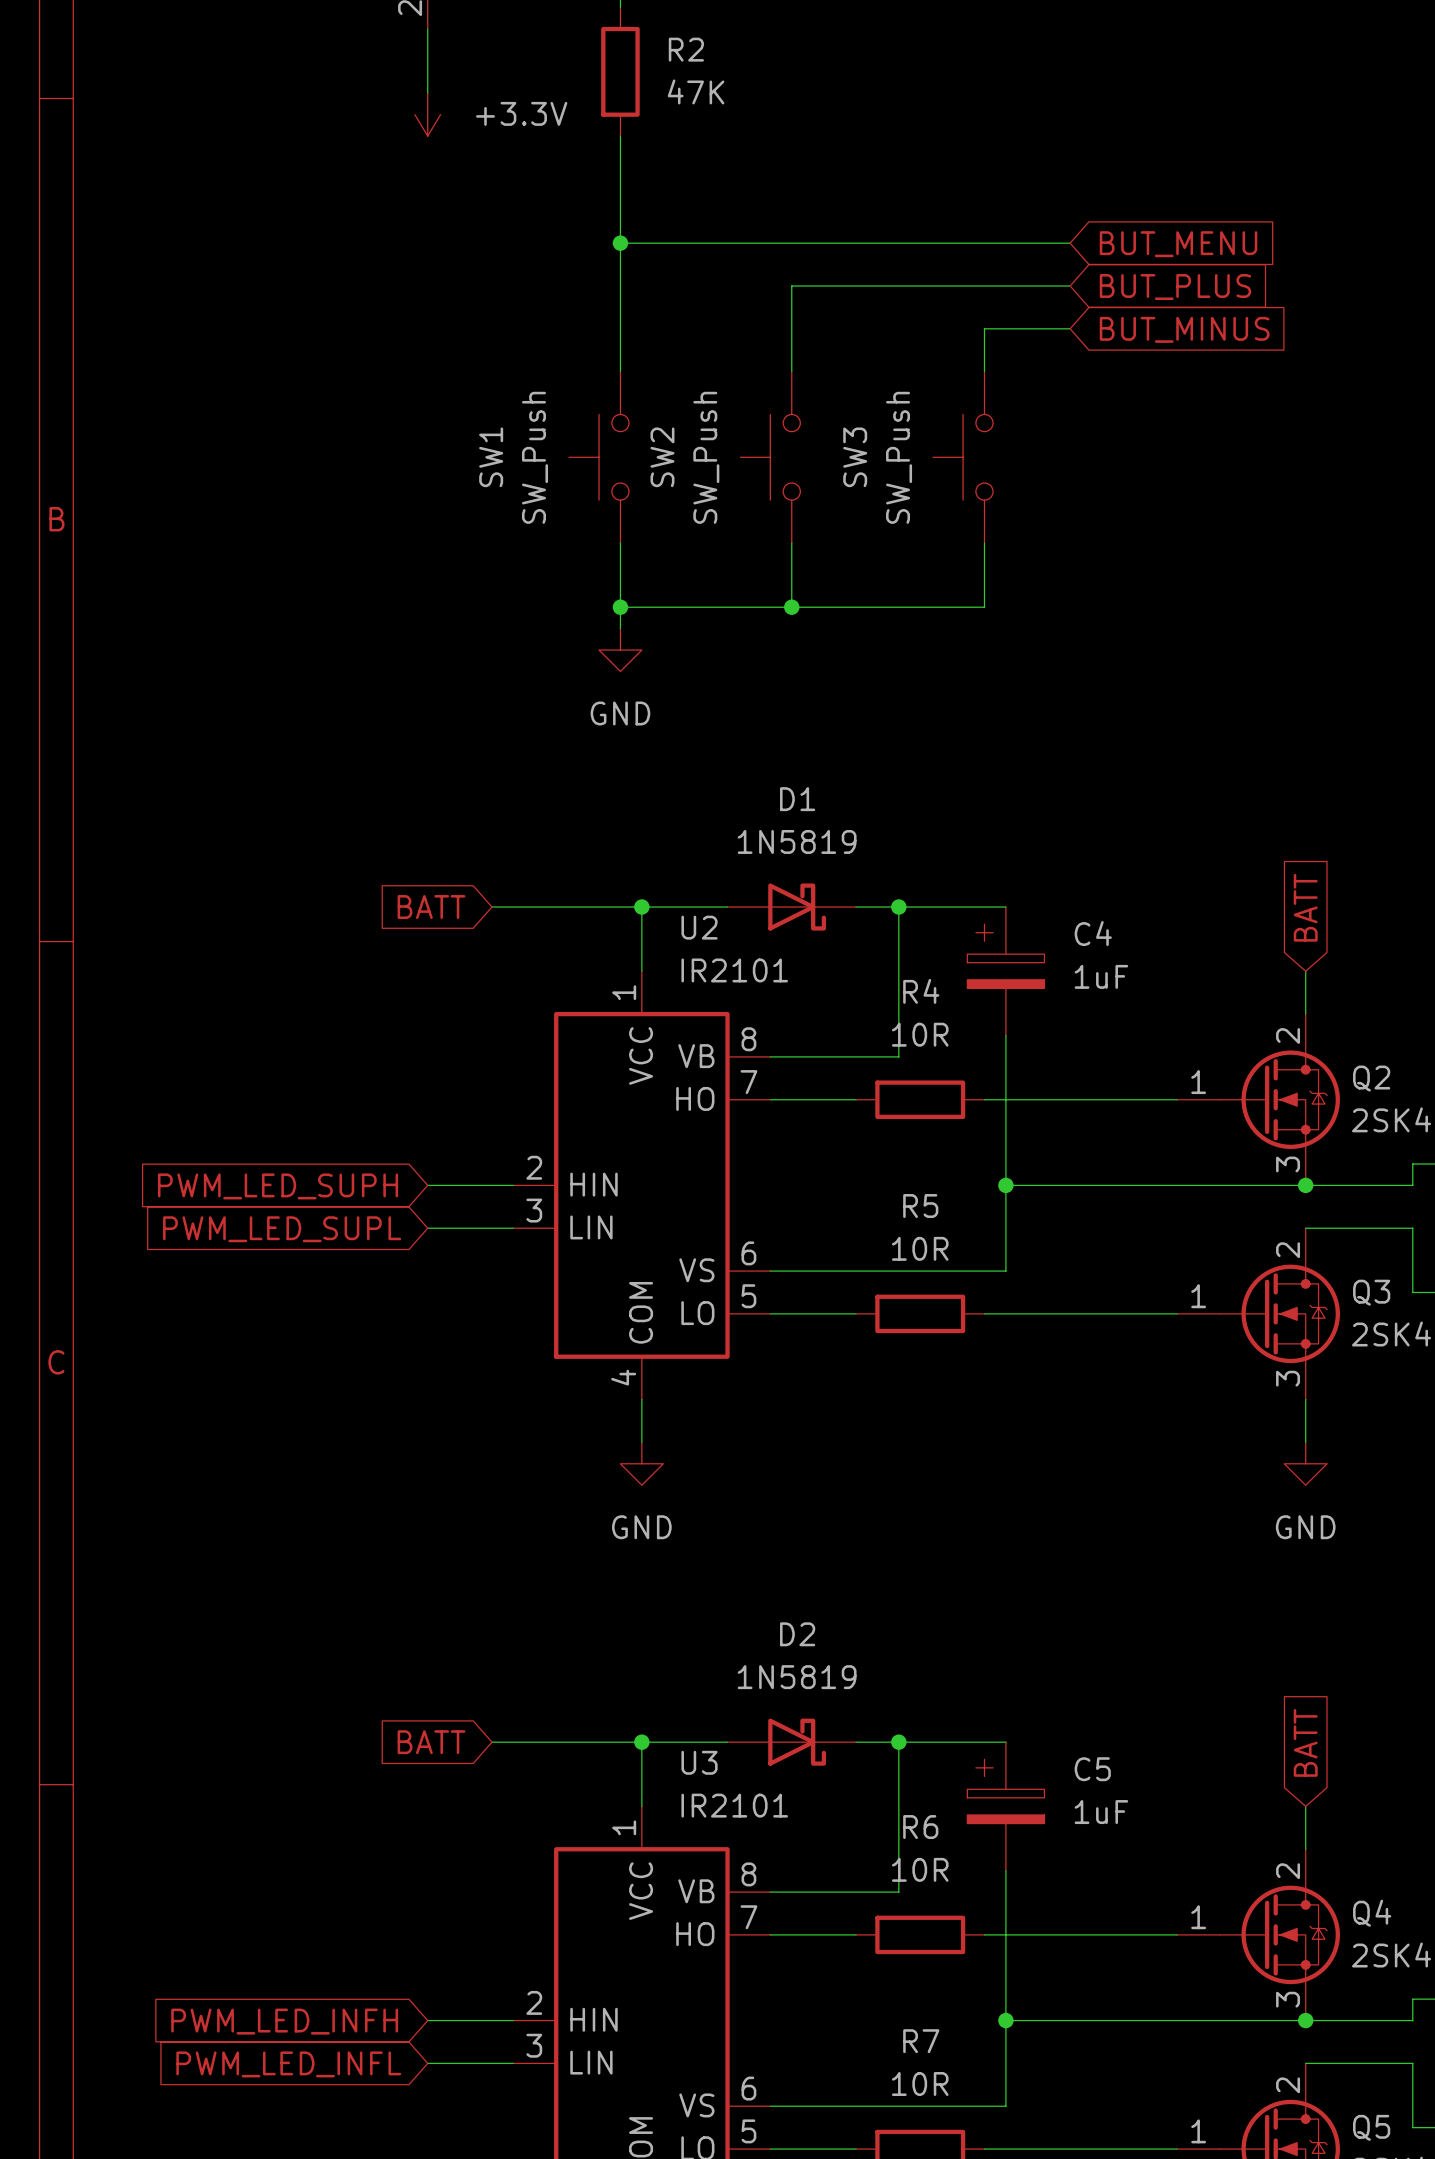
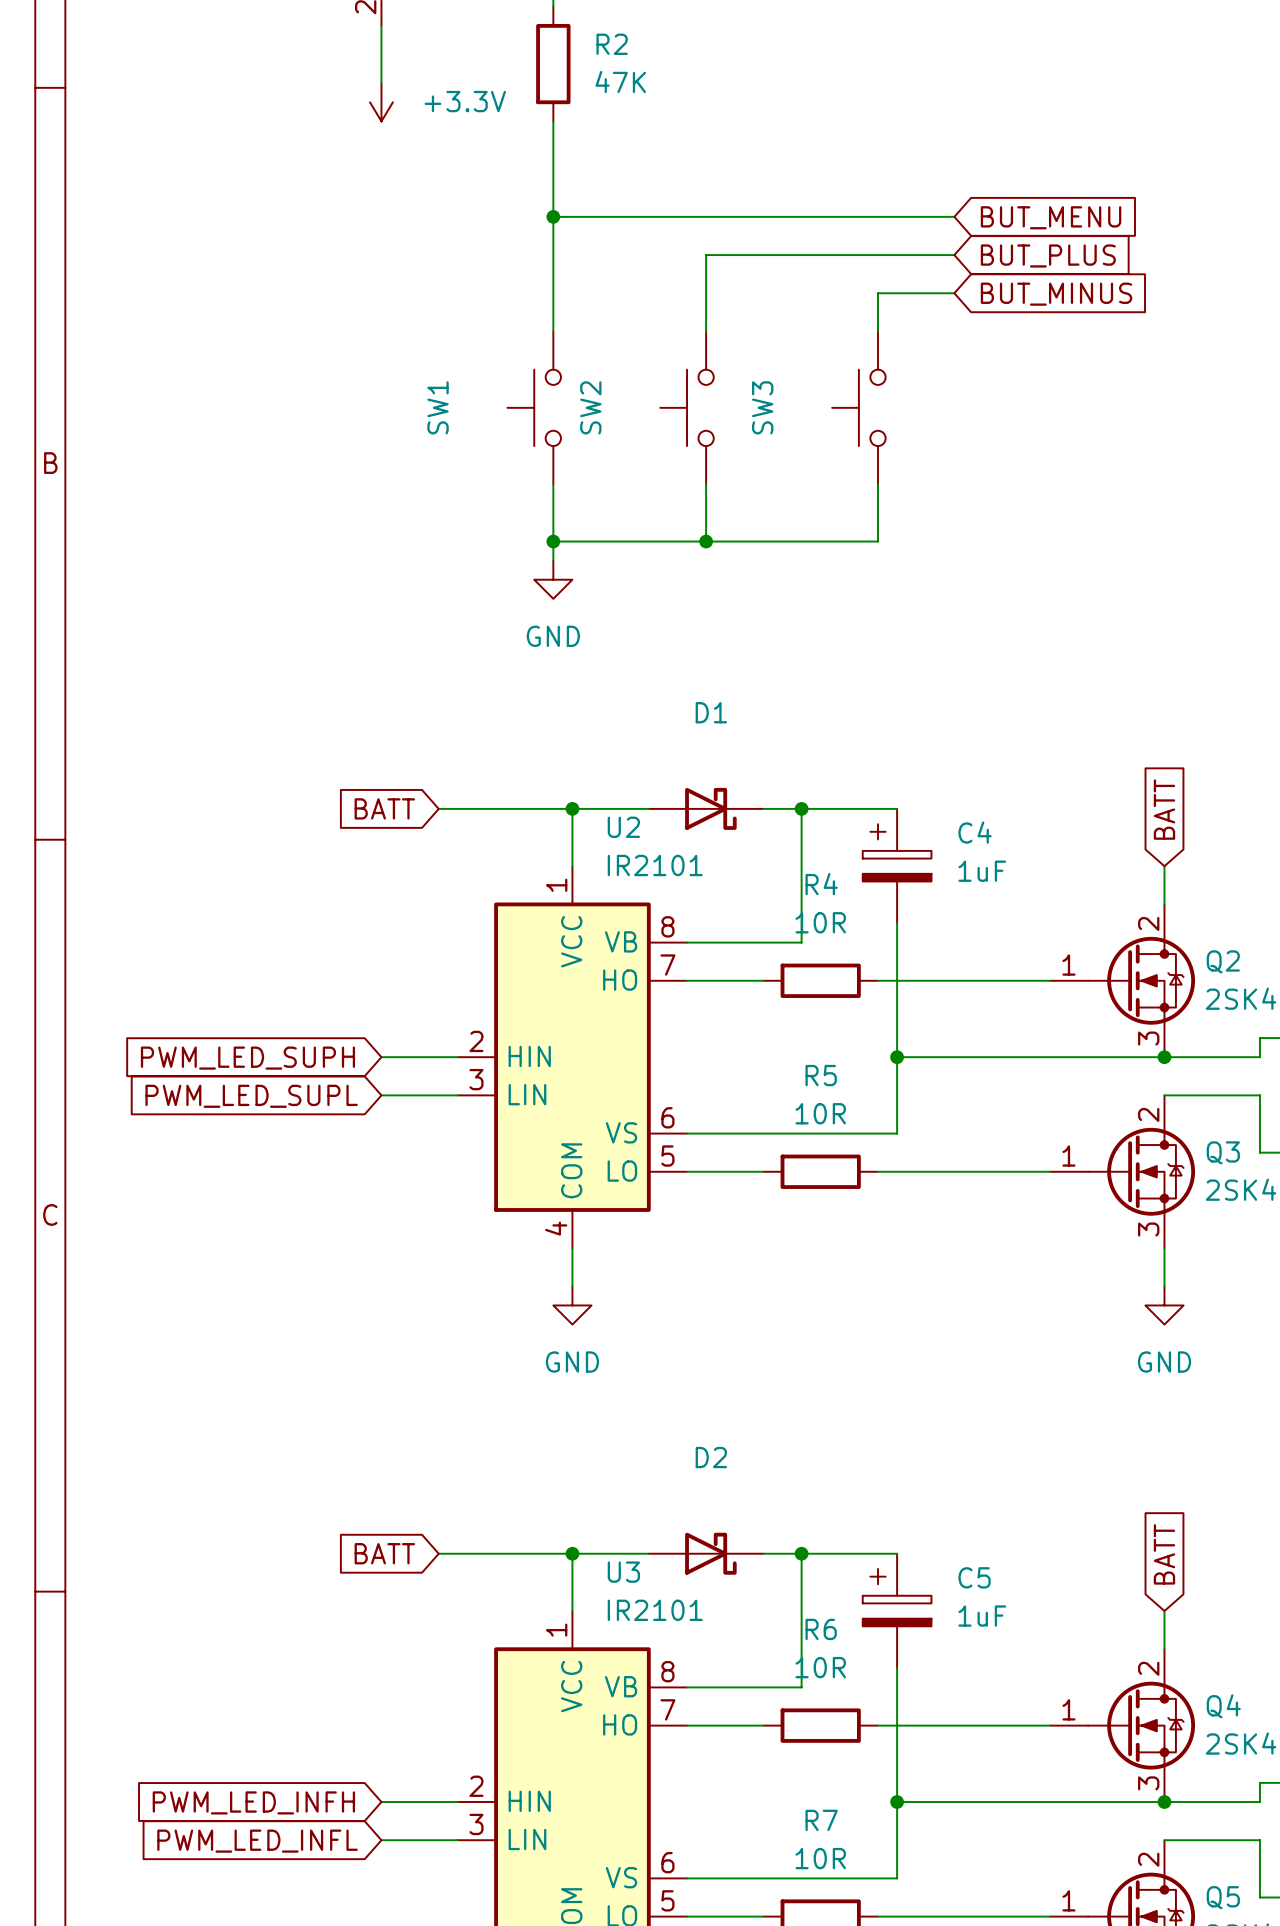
SW1 value: SW_Push (535, 457) -> none
SW2 value: SW_Push (706, 457) -> none
SW3 value: SW_Push (899, 457) -> none
D1 value: 1N5819 (797, 841) -> none
D2 value: 1N5819 (797, 1677) -> none

